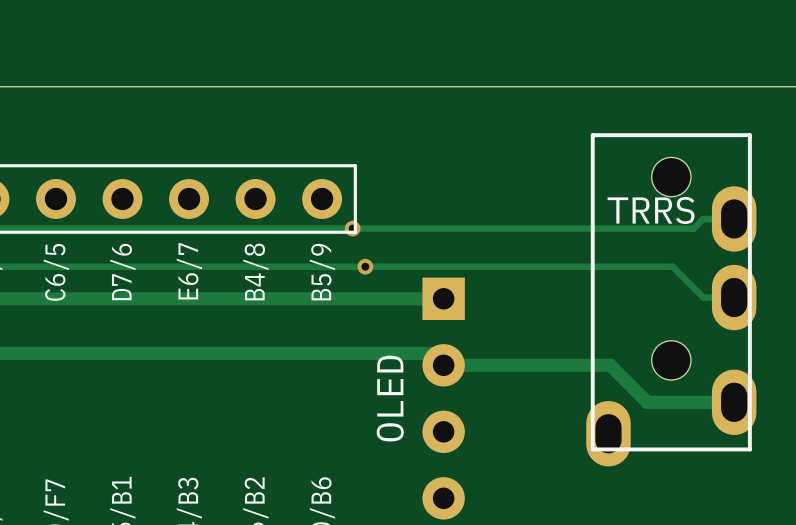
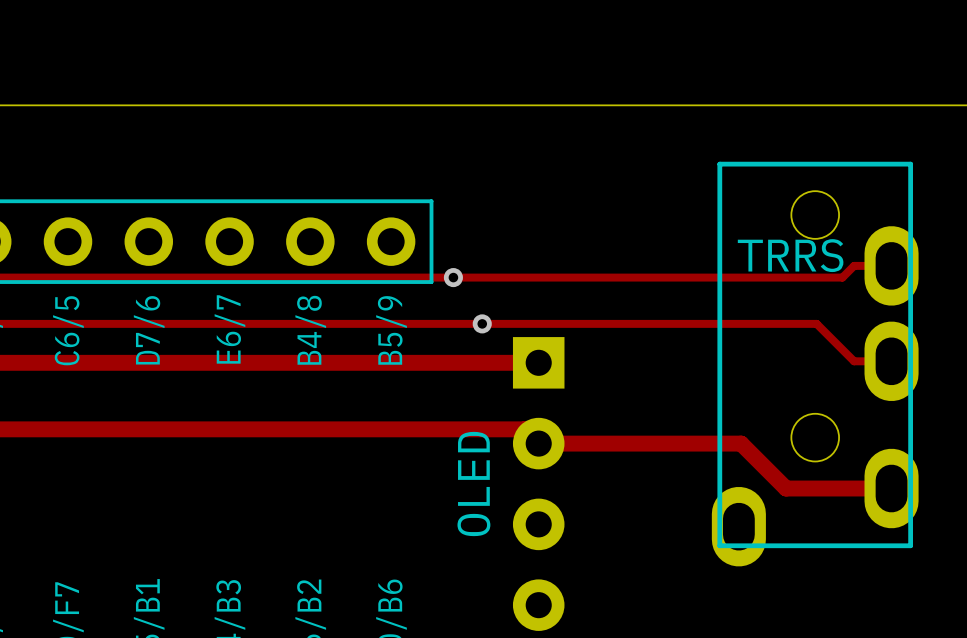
via: (352, 228) -> none
via: none -> (453, 277)
via: (365, 266) -> none
via: none -> (482, 323)

